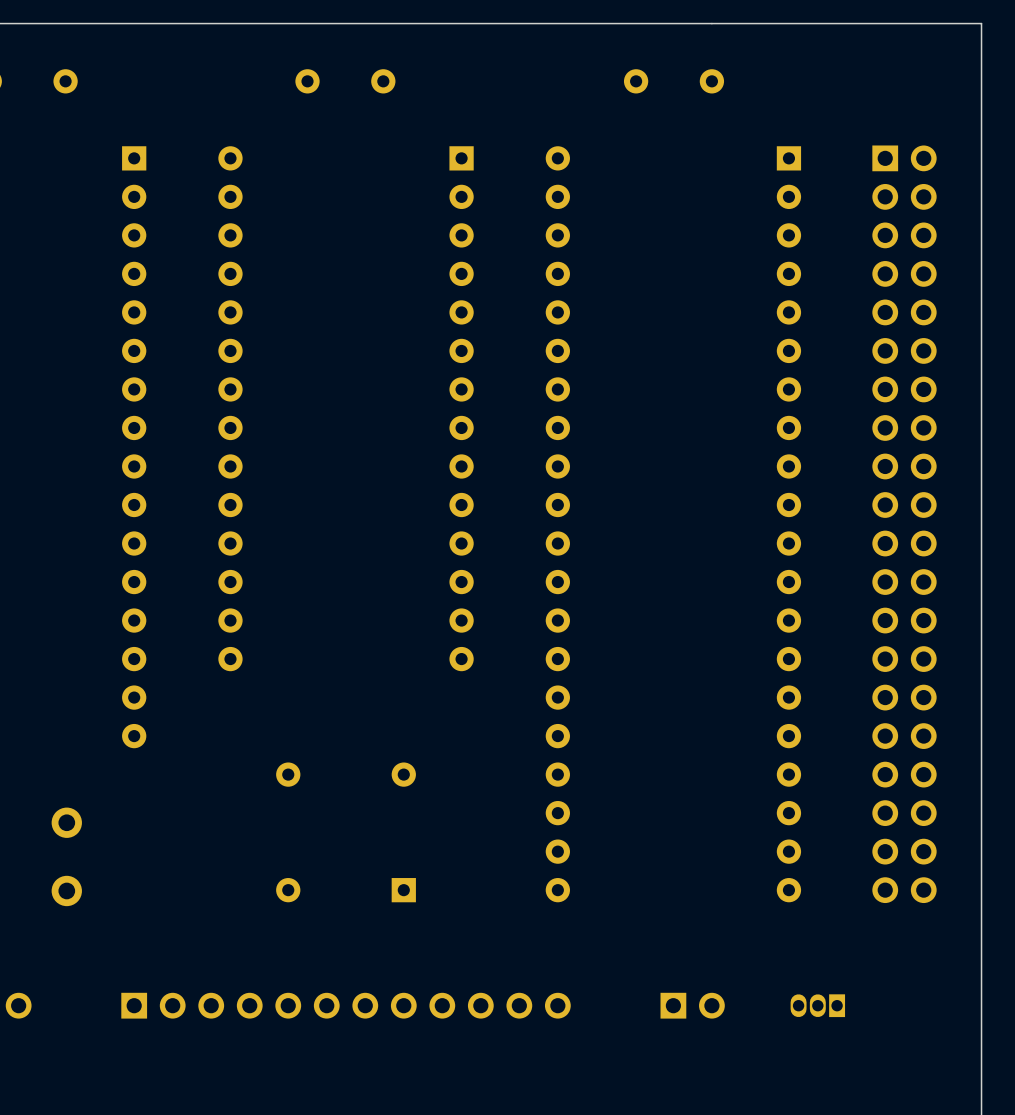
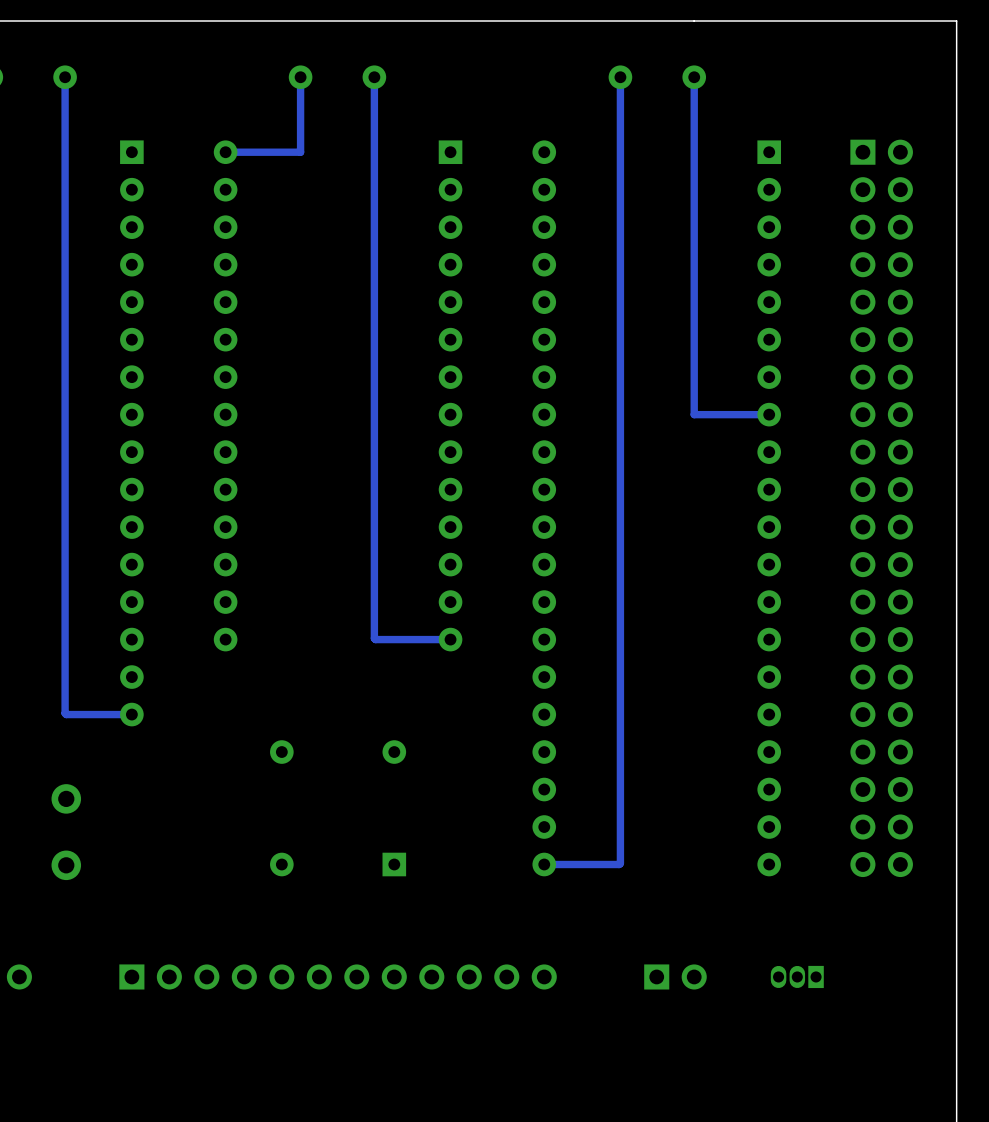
track: none -> (65, 77) (65, 713) (131, 714)
track: none -> (300, 77) (300, 152) (225, 152)
track: none -> (374, 77) (374, 638) (450, 639)
track: none -> (620, 77) (620, 863) (544, 864)
track: none -> (694, 77) (694, 414) (769, 414)

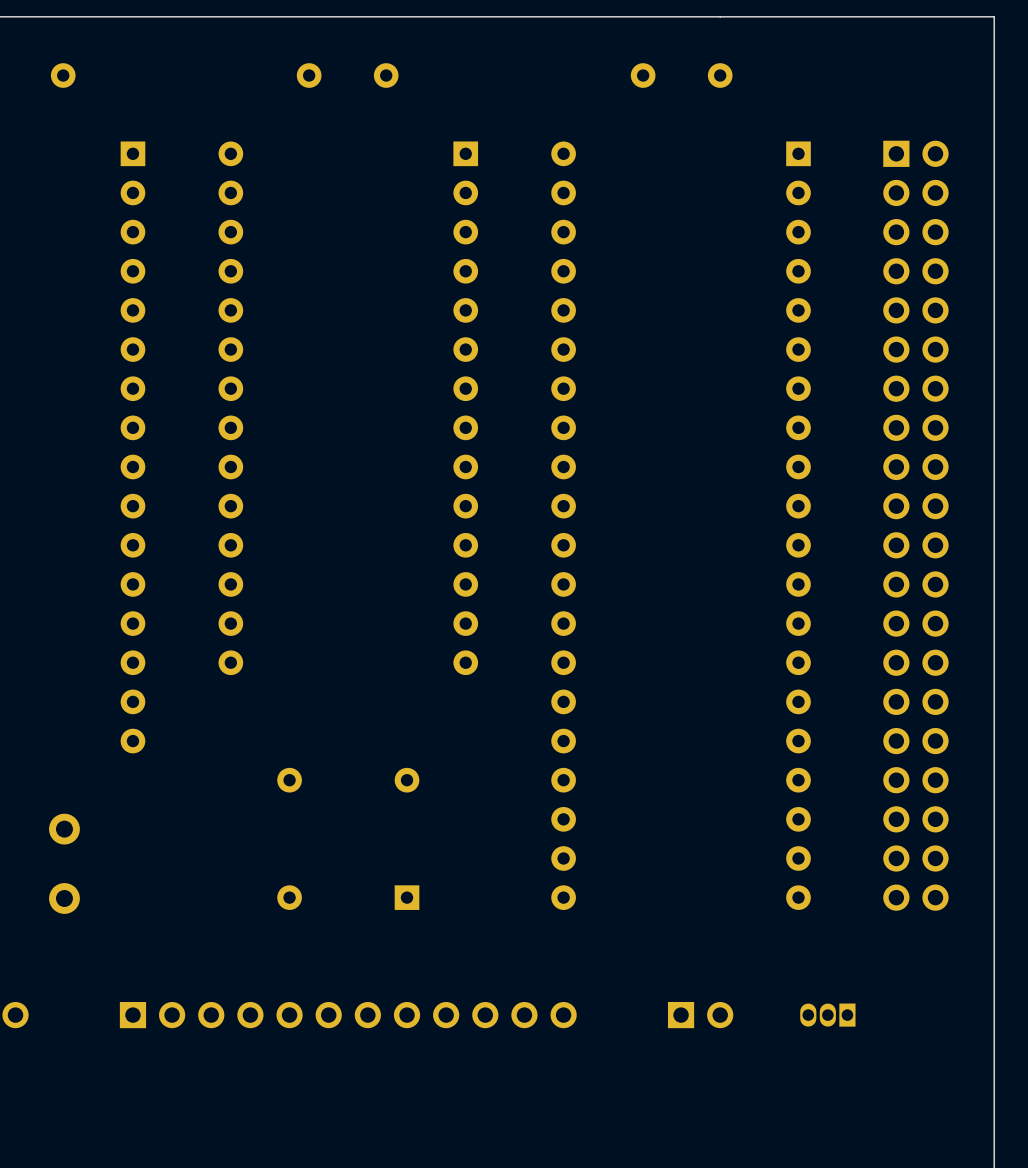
track: (65, 77) (65, 713) (131, 714) -> none
track: (300, 77) (300, 152) (225, 152) -> none
track: (374, 77) (374, 638) (450, 639) -> none
track: (620, 77) (620, 863) (544, 864) -> none
track: (694, 77) (694, 414) (769, 414) -> none

